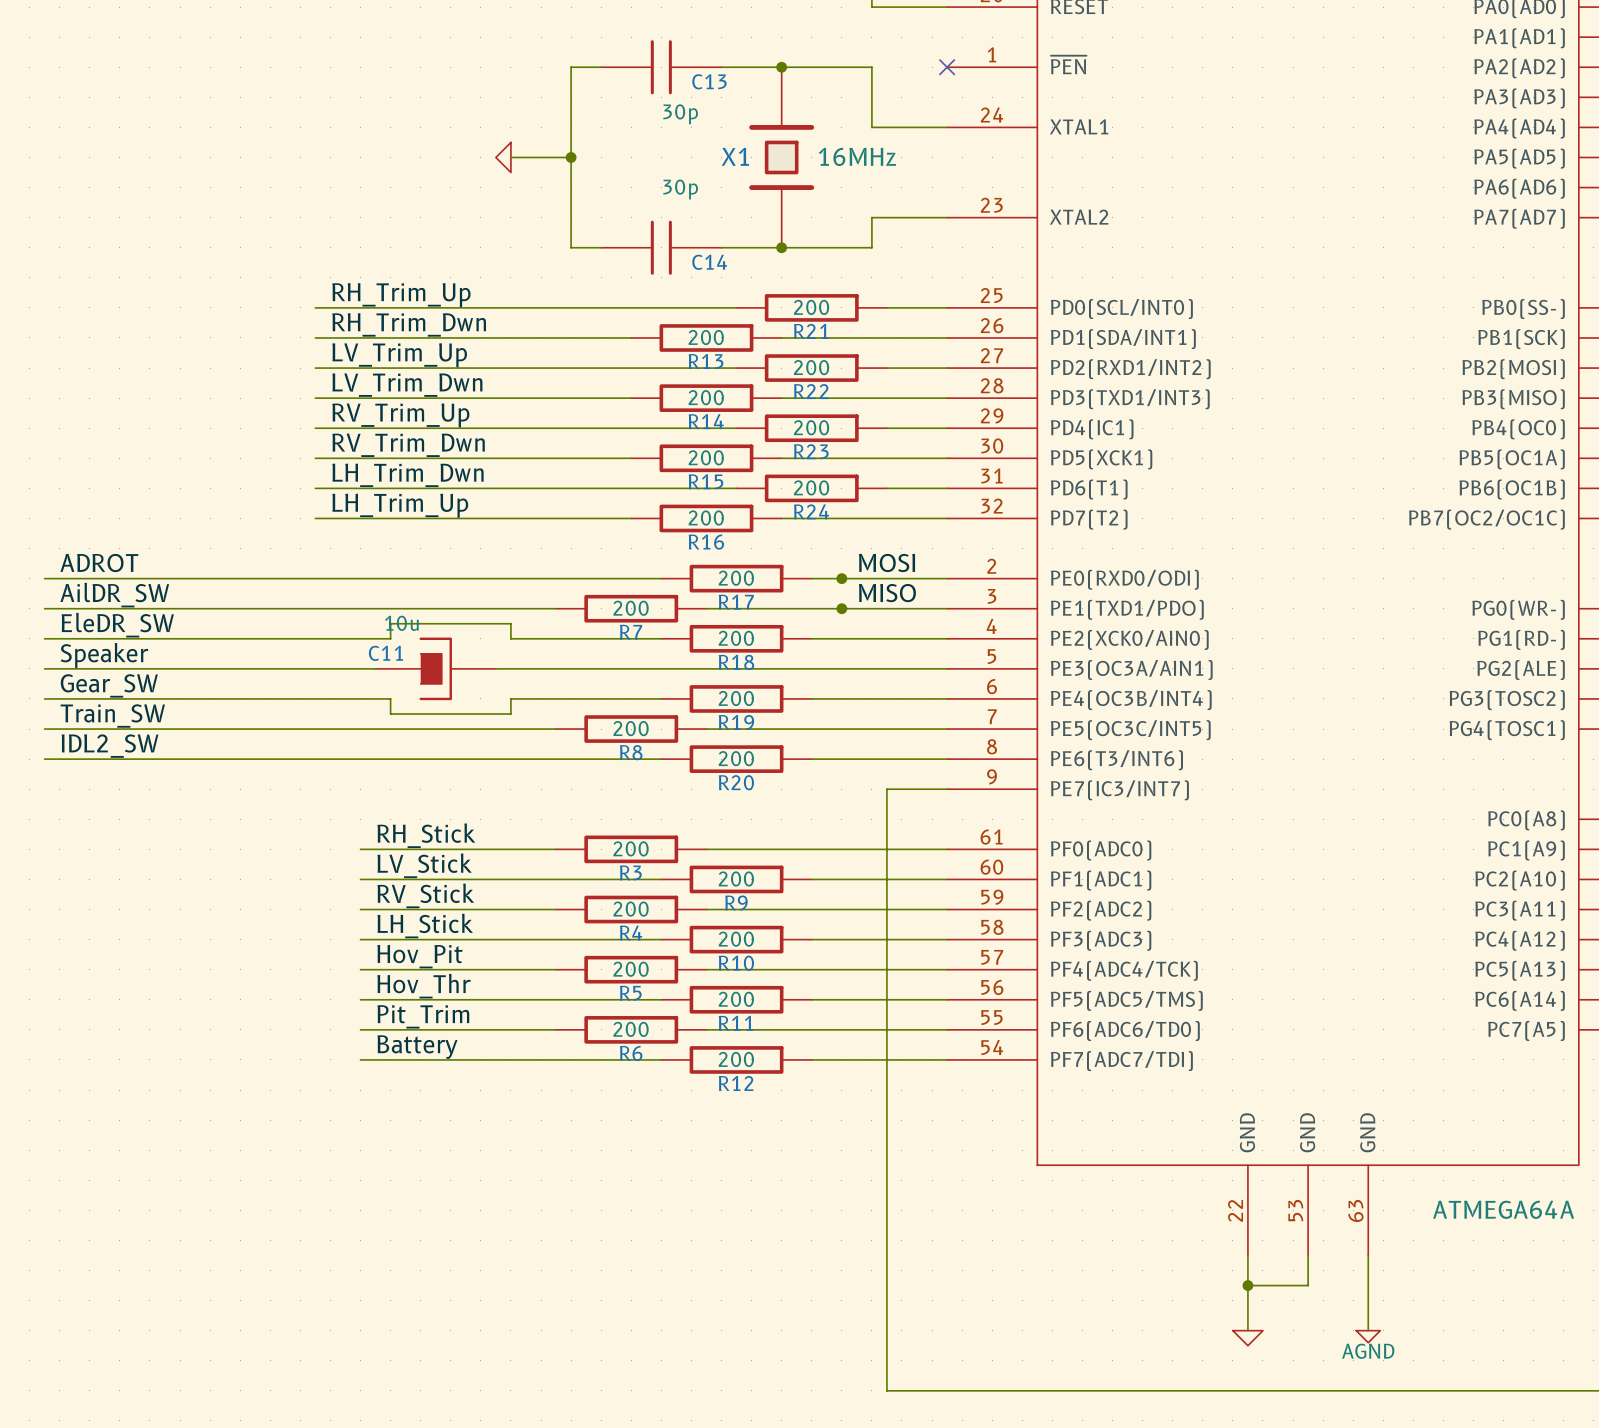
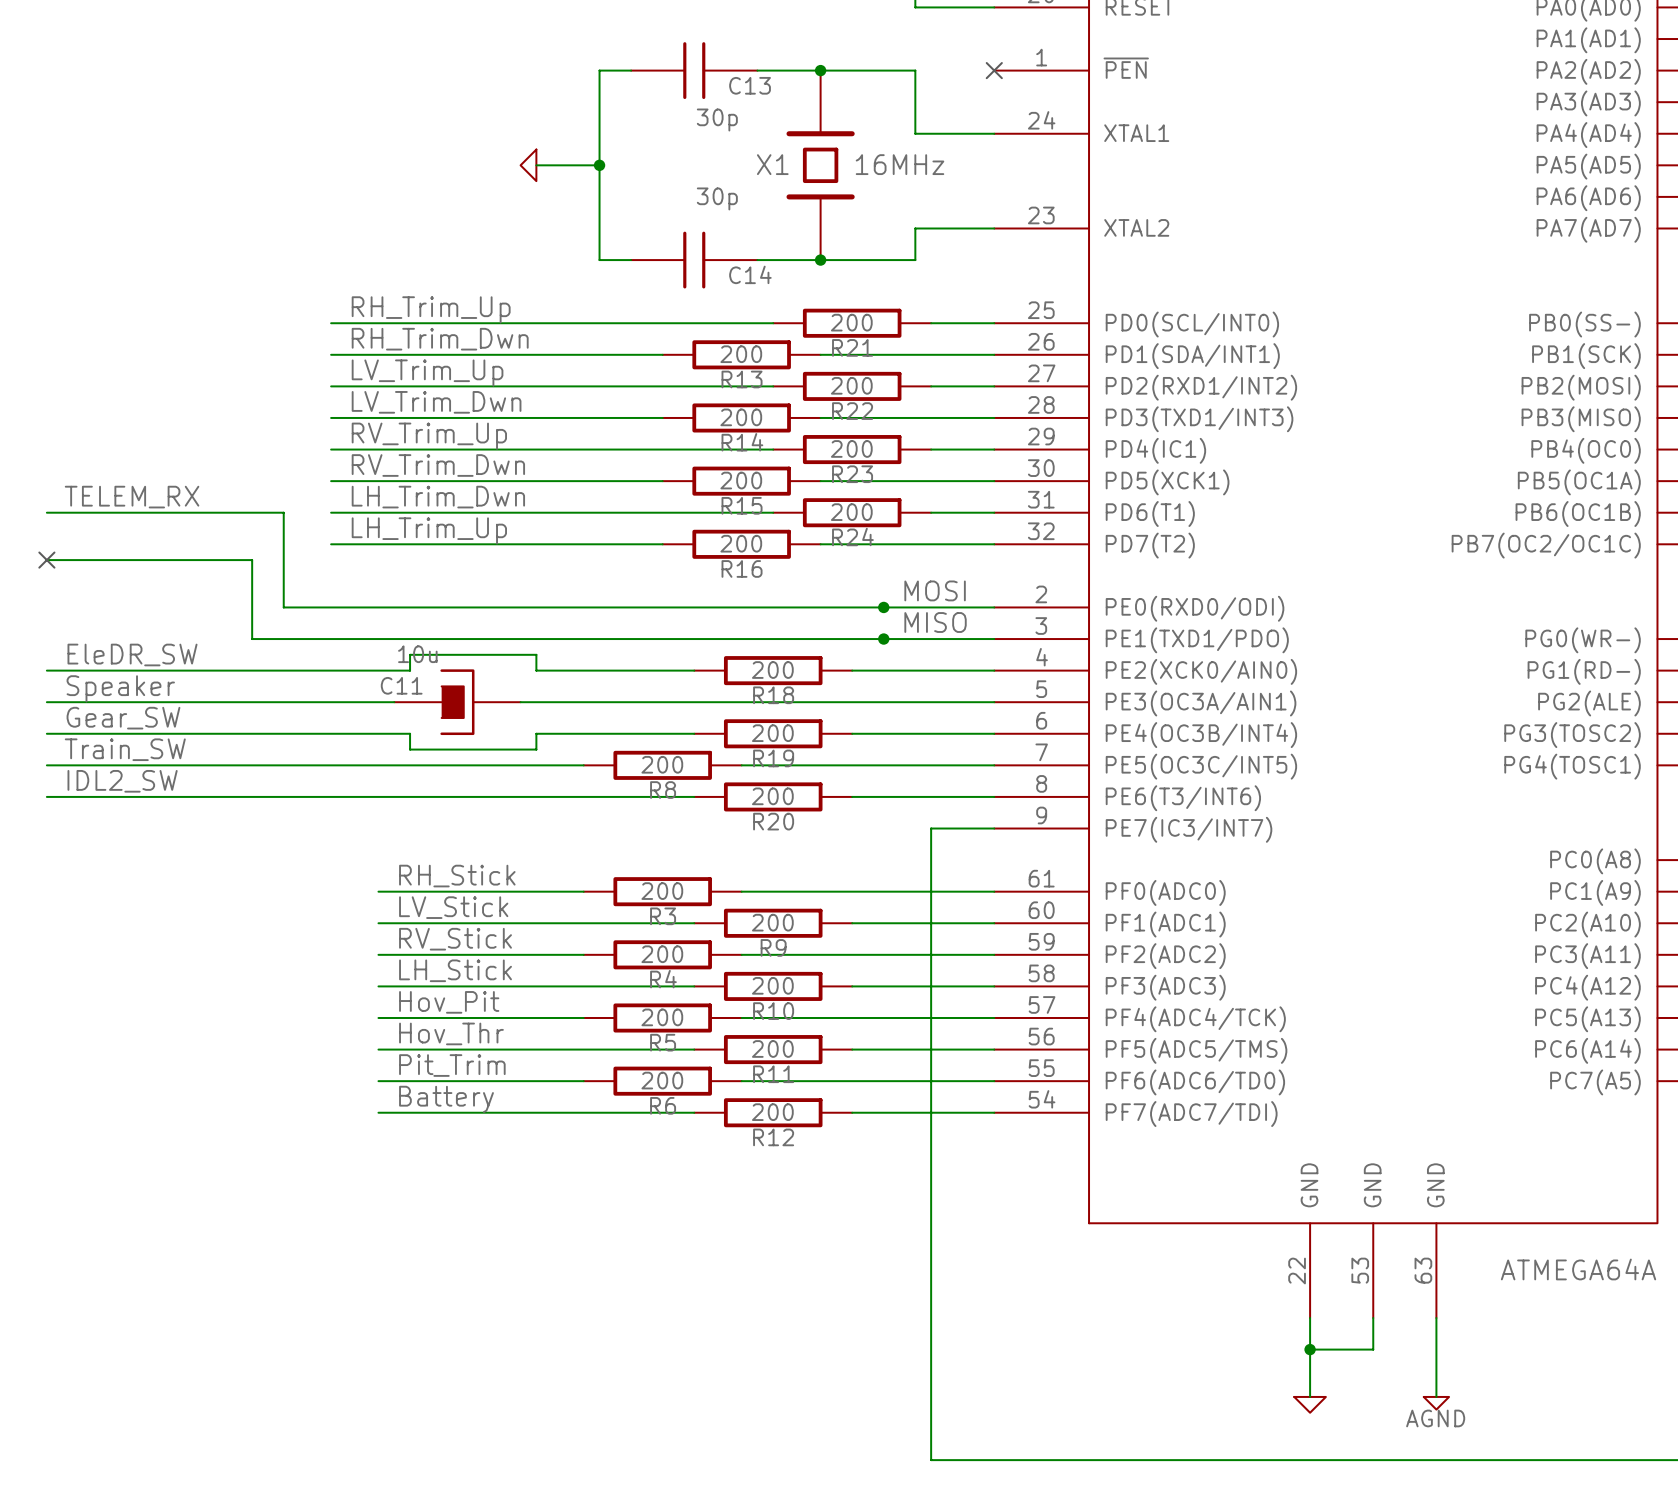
label: none -> TELEM_RX (132, 497)
no-connect mark: none -> (46, 560)
label: ADROT (99, 562) -> none
wire: (44, 578) (270, 578) -> (46, 512) (283, 512) (283, 607)
wire: none -> (694, 607) (852, 607)
R17: 200 (736, 578) -> none
label: AilDR_SW (114, 595) -> none
wire: (44, 608) (240, 608) -> (46, 560) (252, 560) (252, 639)
wire: none -> (583, 639) (741, 639)
R7: 200 (631, 608) -> none

